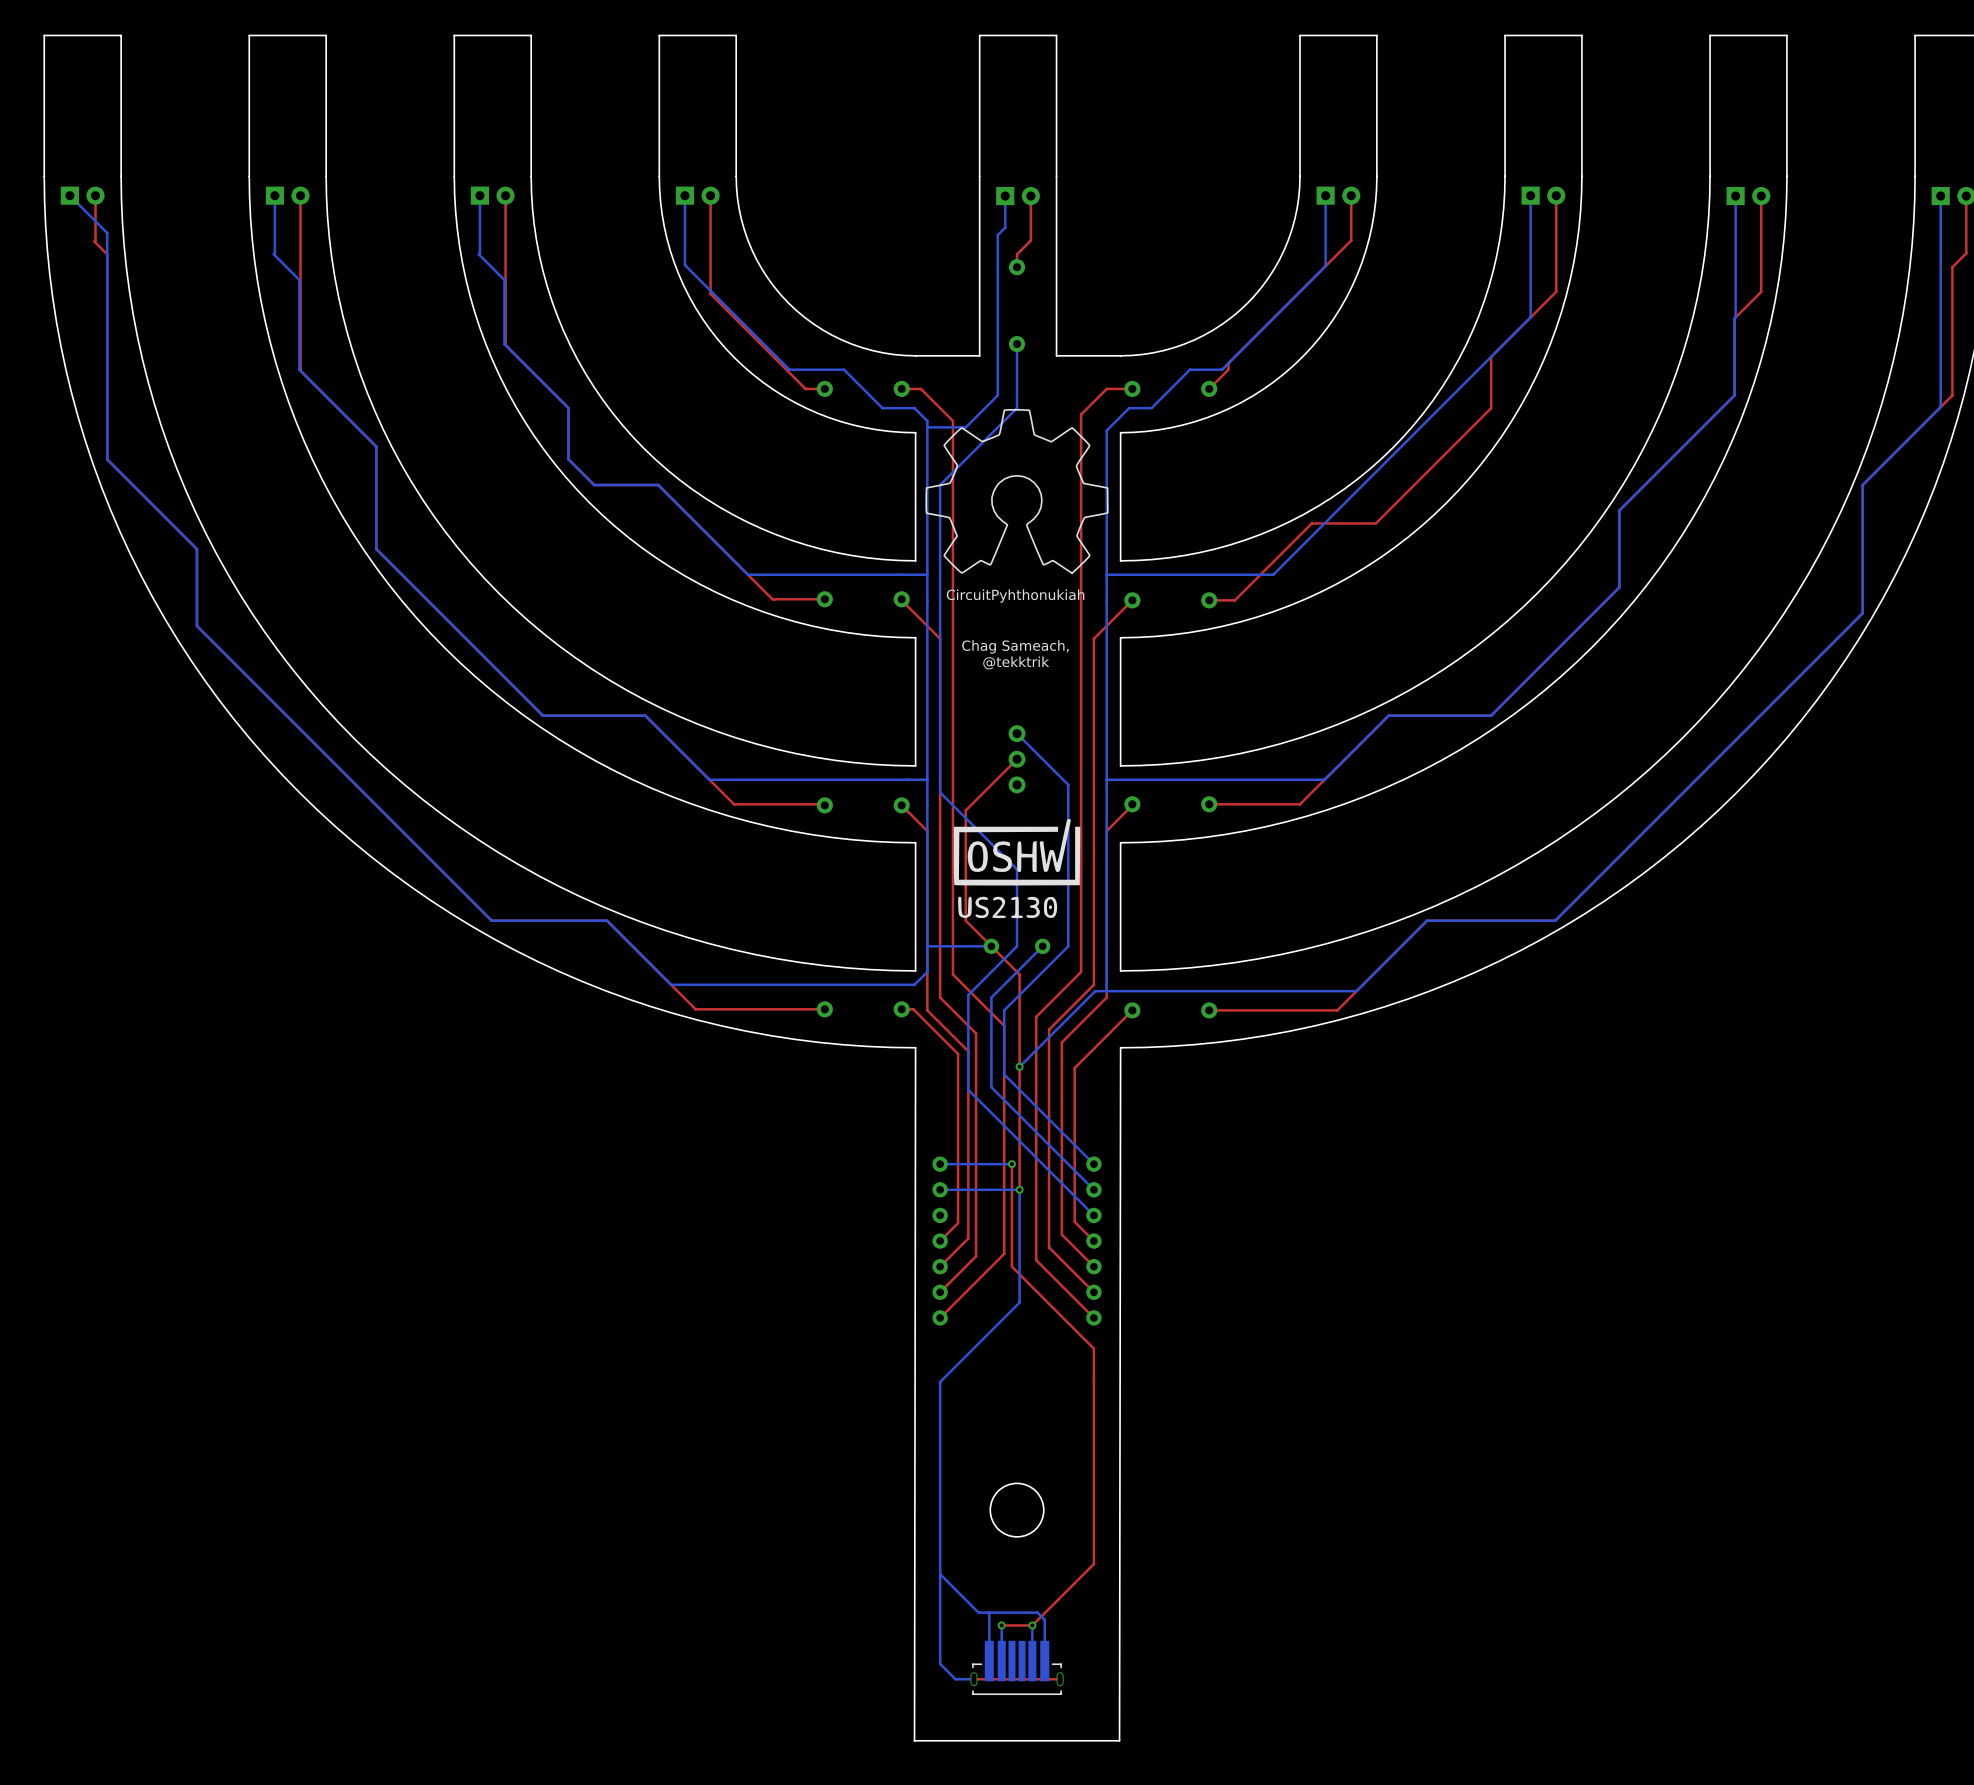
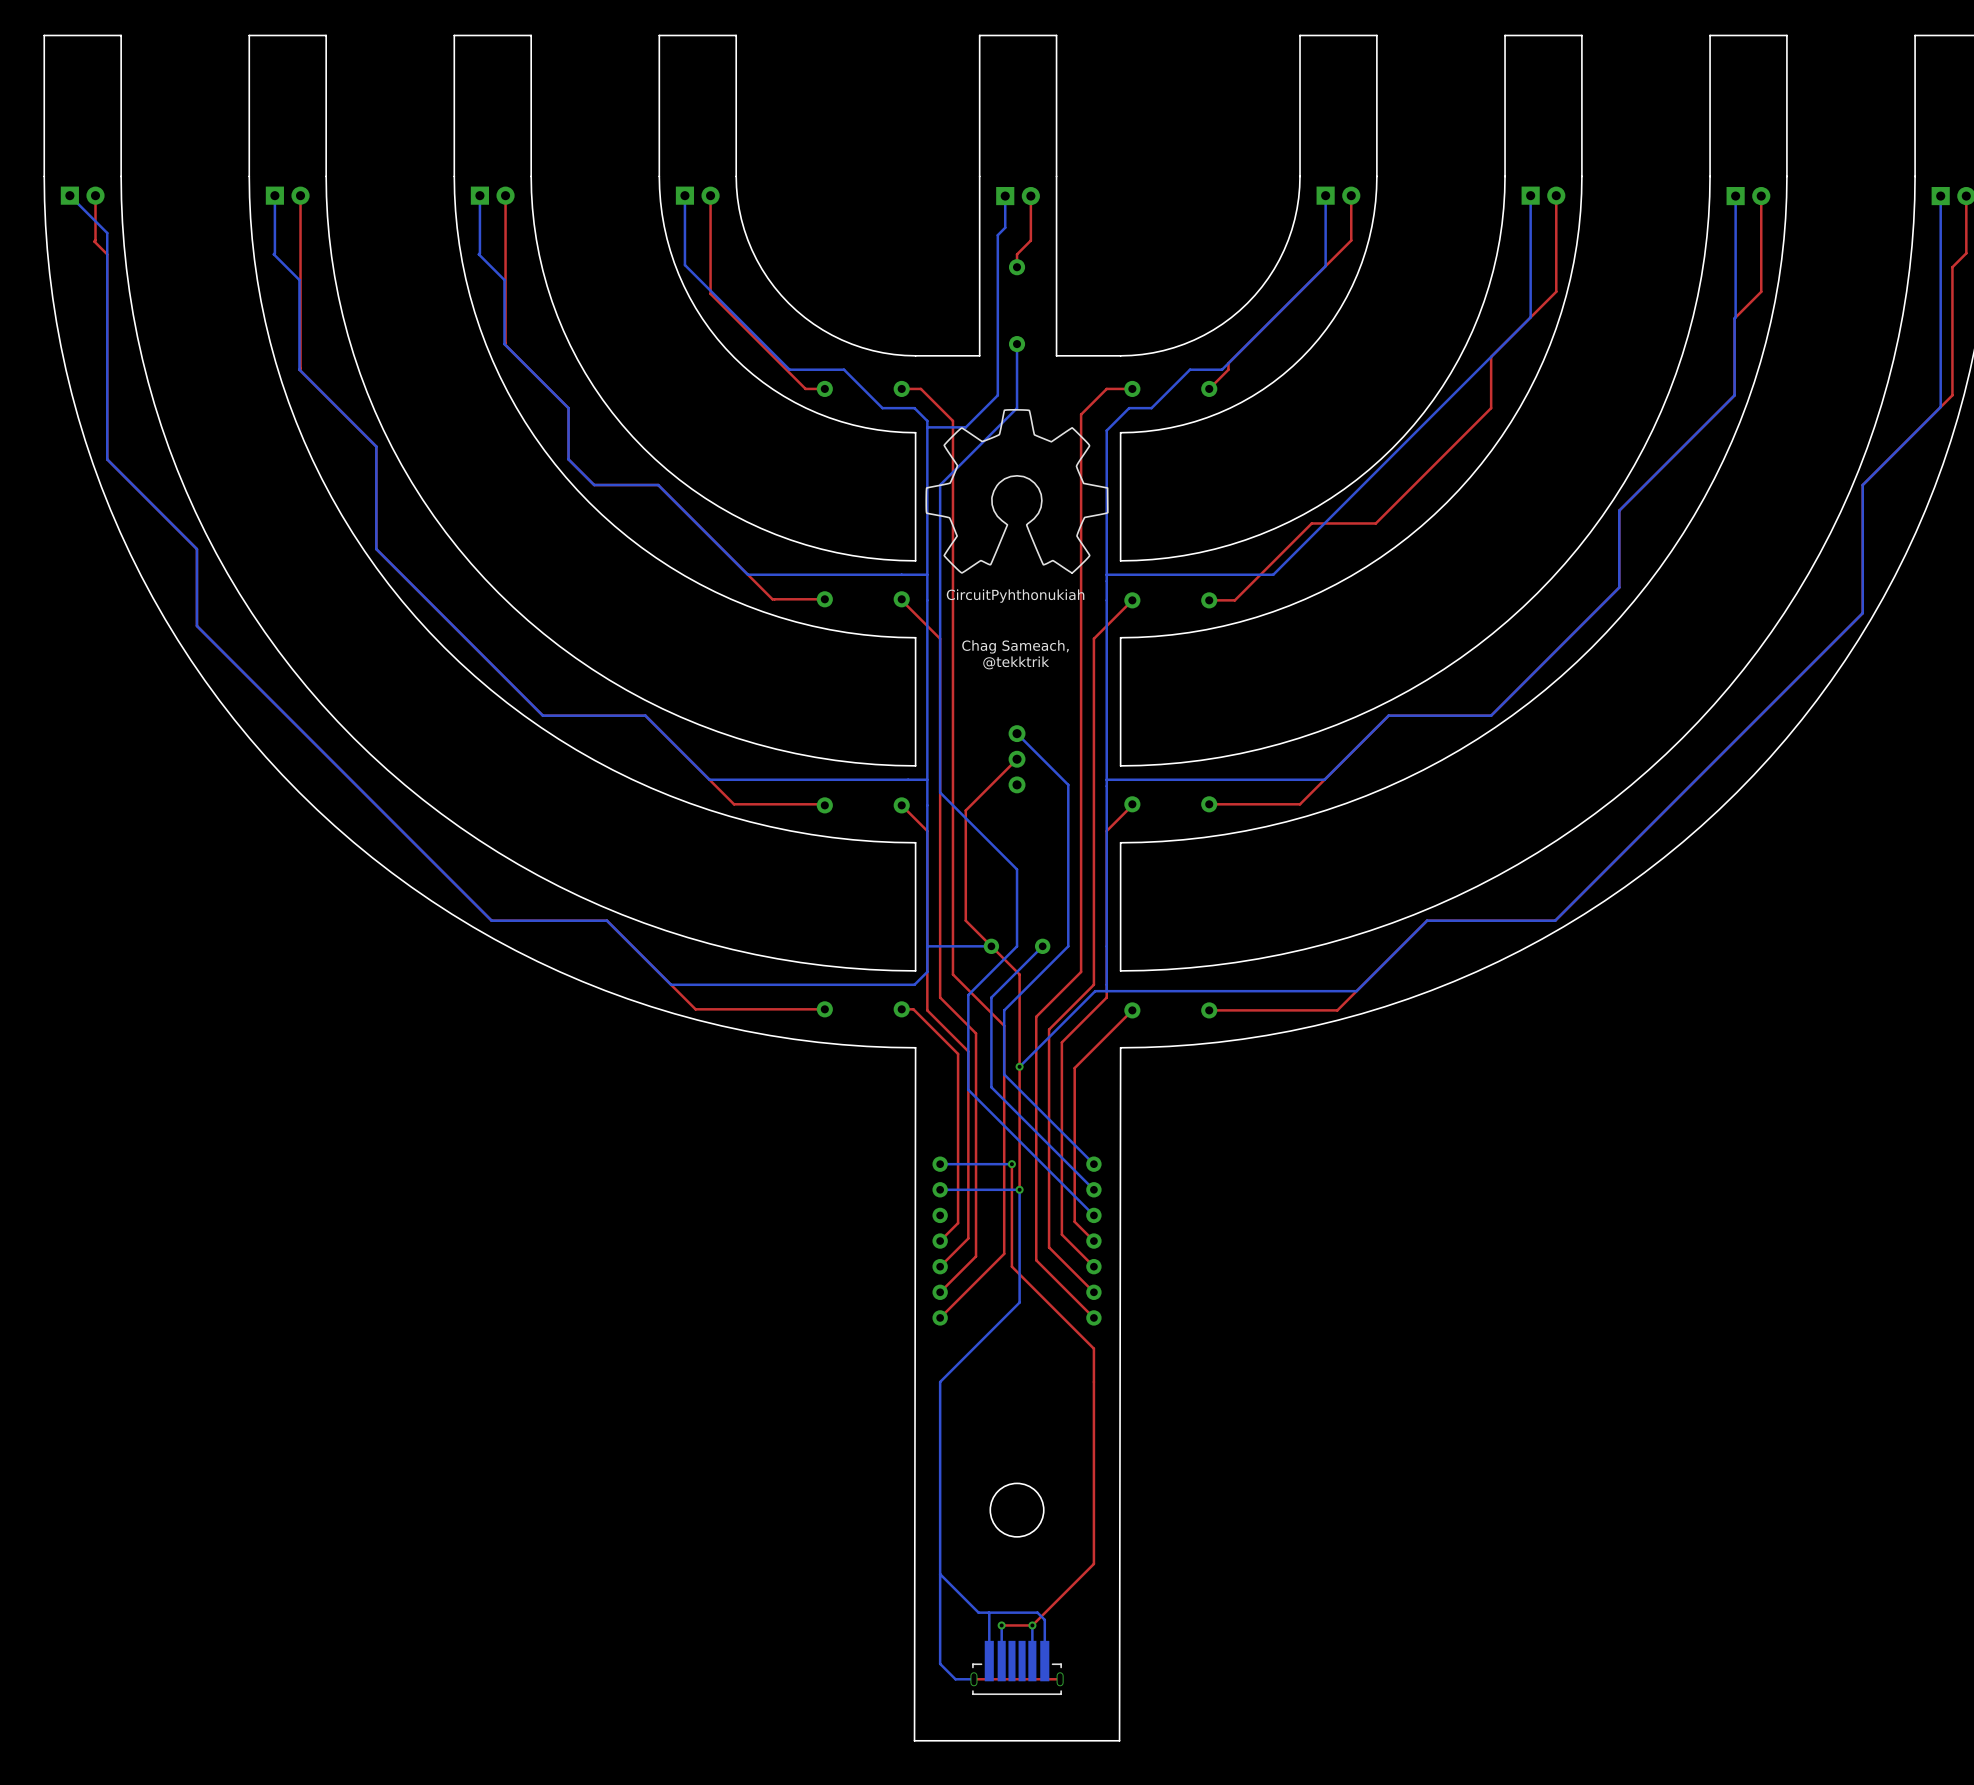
drawing: [953, 819, 1081, 919] -> none

